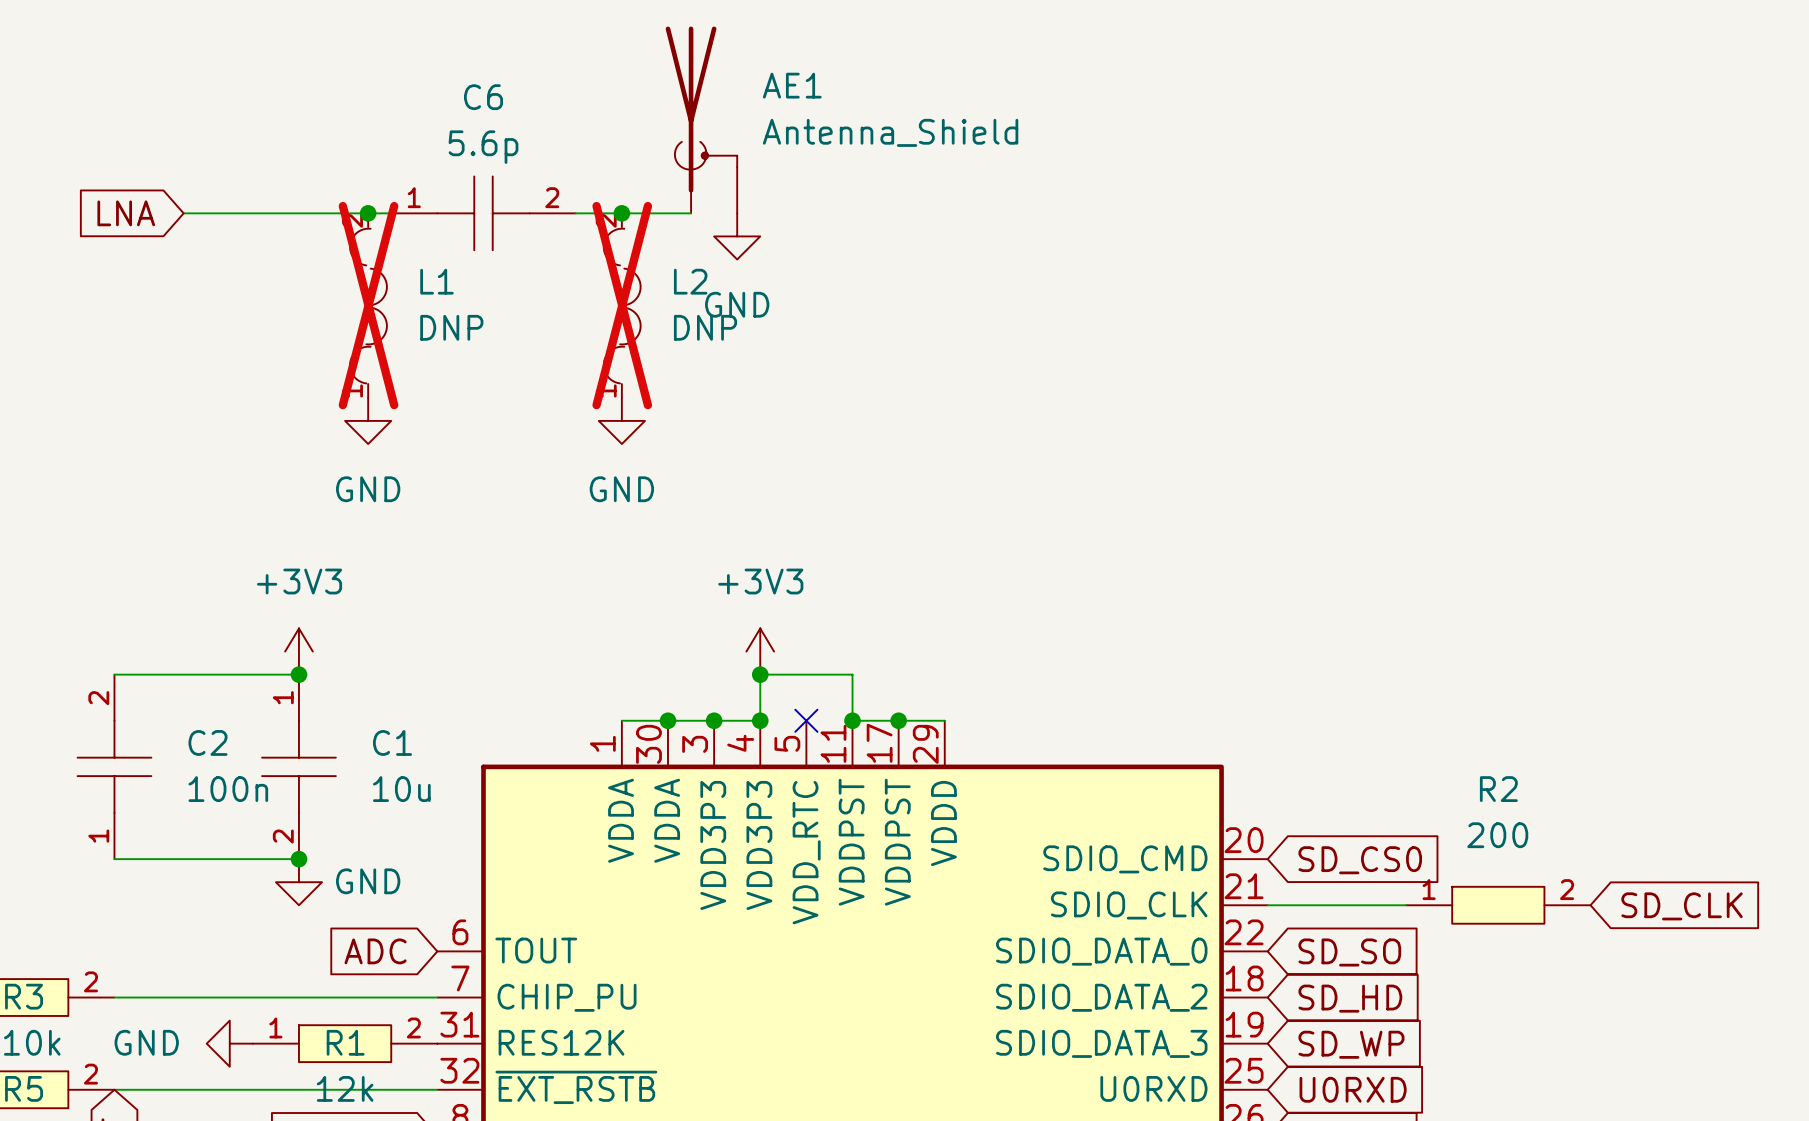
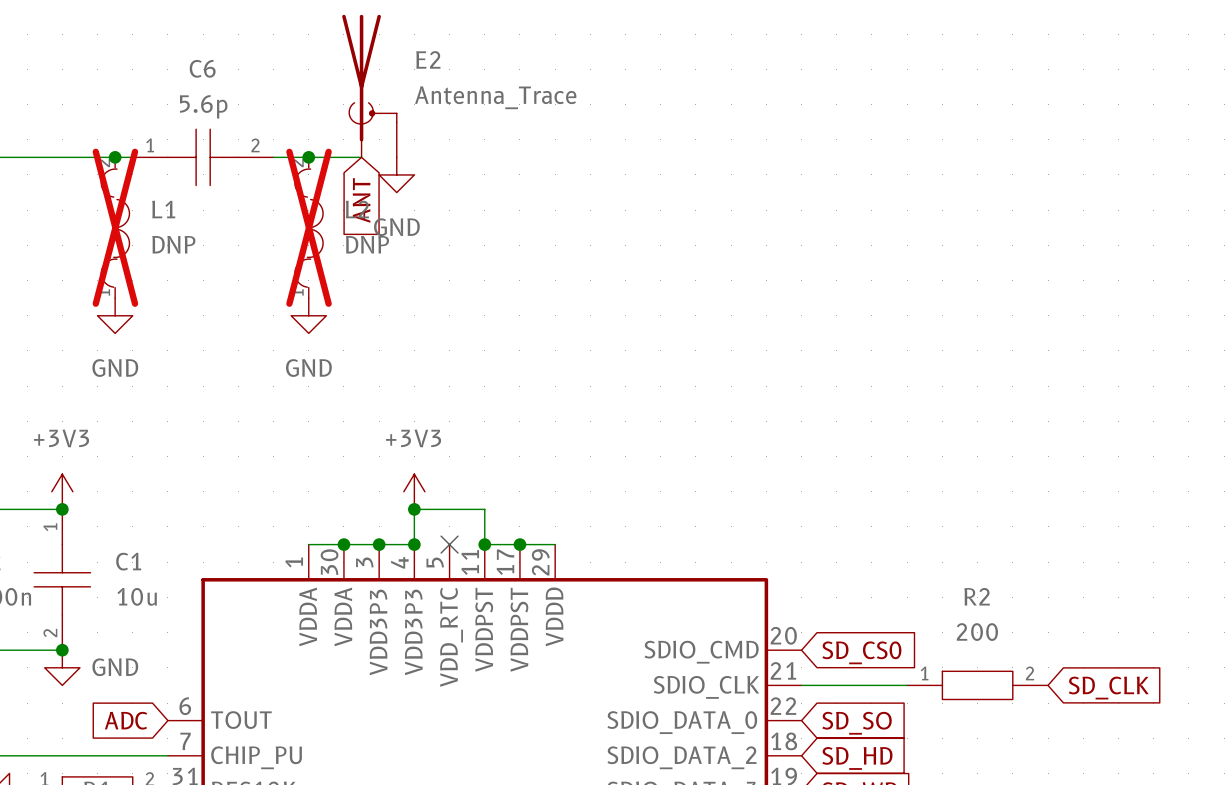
AE1 name: AE1 (792, 85) -> E2 (428, 59)
AE1 value: Antenna_Shield (890, 132) -> Antenna_Trace (495, 97)
global label: none -> ANT (361, 200)

